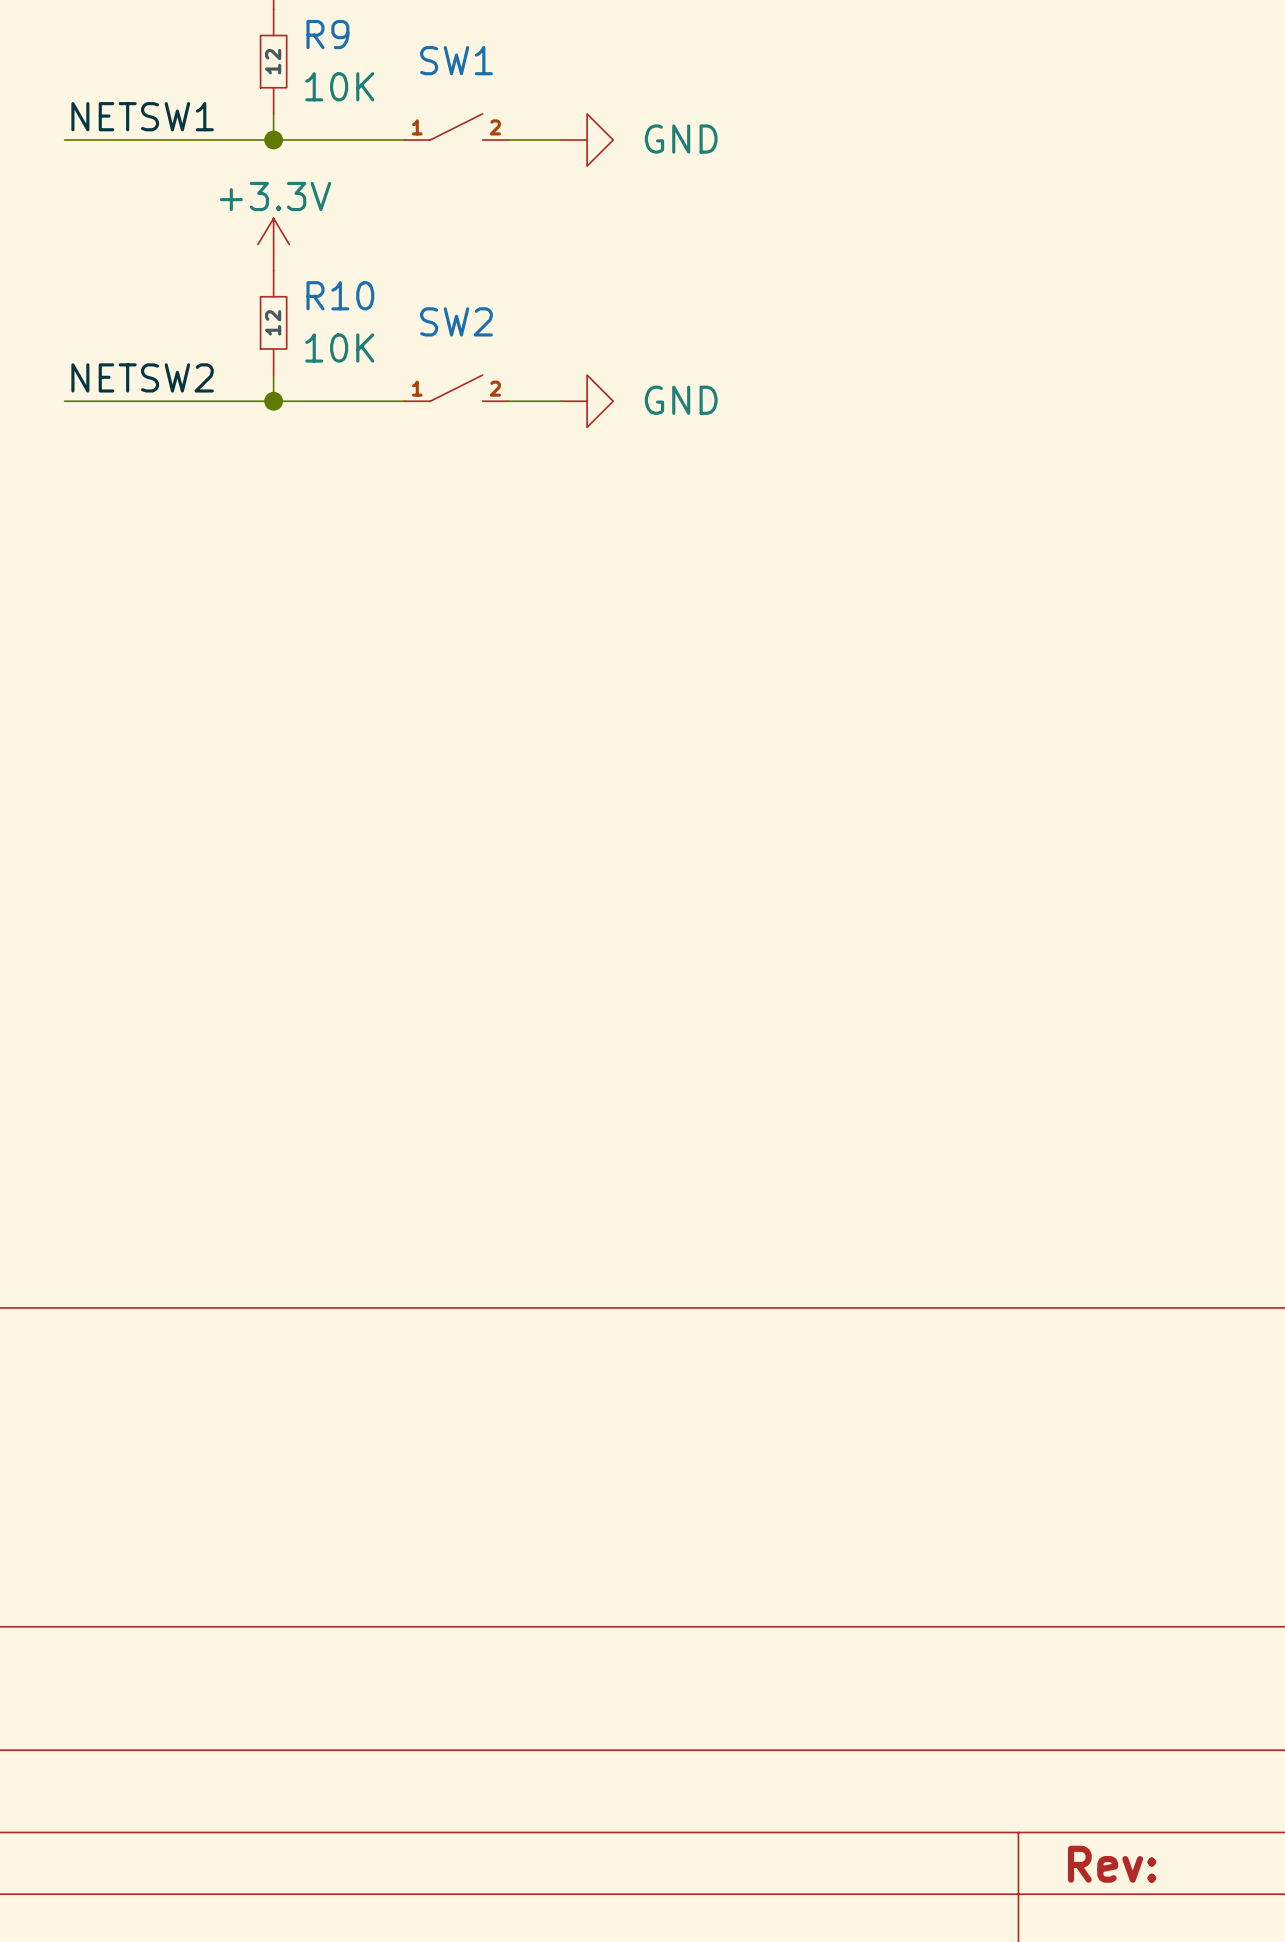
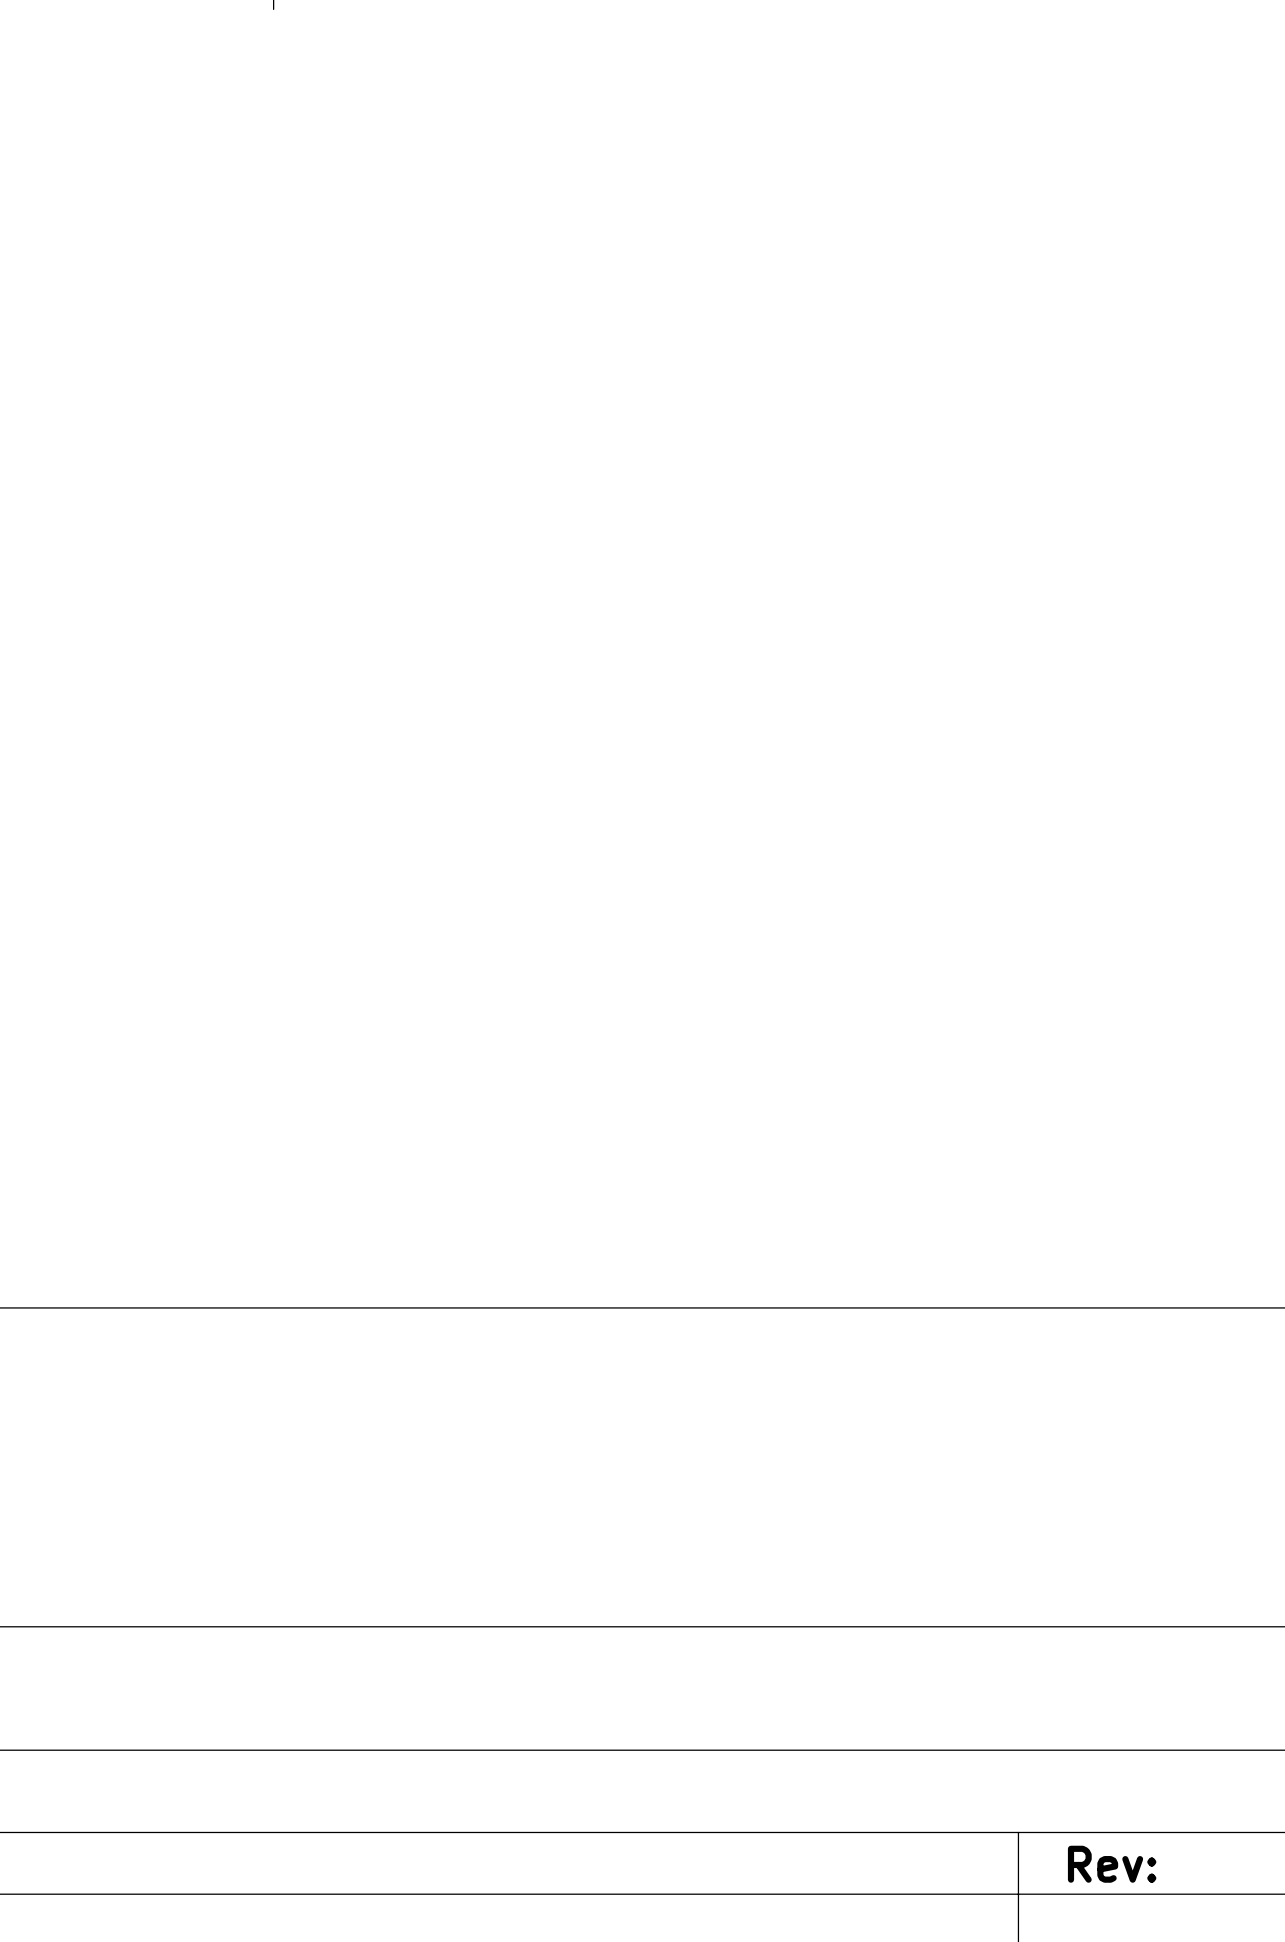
R9: 10K (273, 61) -> none
wire: (273, 113) (273, 140) -> none
label: NETSW1 (142, 116) -> none
SW1: (456, 126) -> none
wire: (64, 140) (404, 140) -> none
junction: (273, 140) -> none
wire: (508, 140) (560, 140) -> none
power symbol: GND (587, 140) -> none
power symbol: +3.3V (273, 244) -> none
R10: 10K (273, 322) -> none
wire: (273, 375) (273, 401) -> none
label: NETSW2 (142, 377) -> none
SW2: (456, 388) -> none
wire: (64, 401) (404, 401) -> none
junction: (273, 401) -> none
wire: (508, 401) (560, 401) -> none
power symbol: GND (587, 401) -> none

